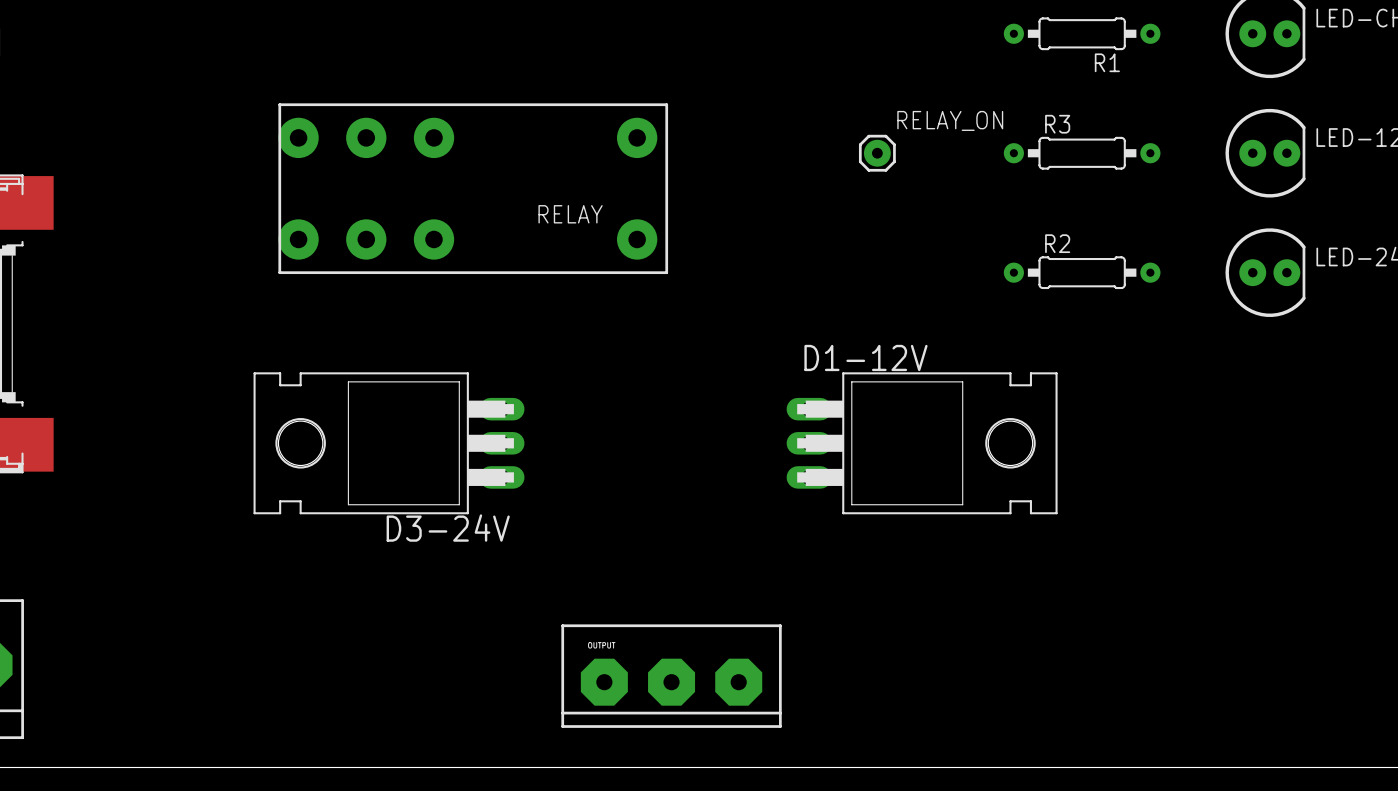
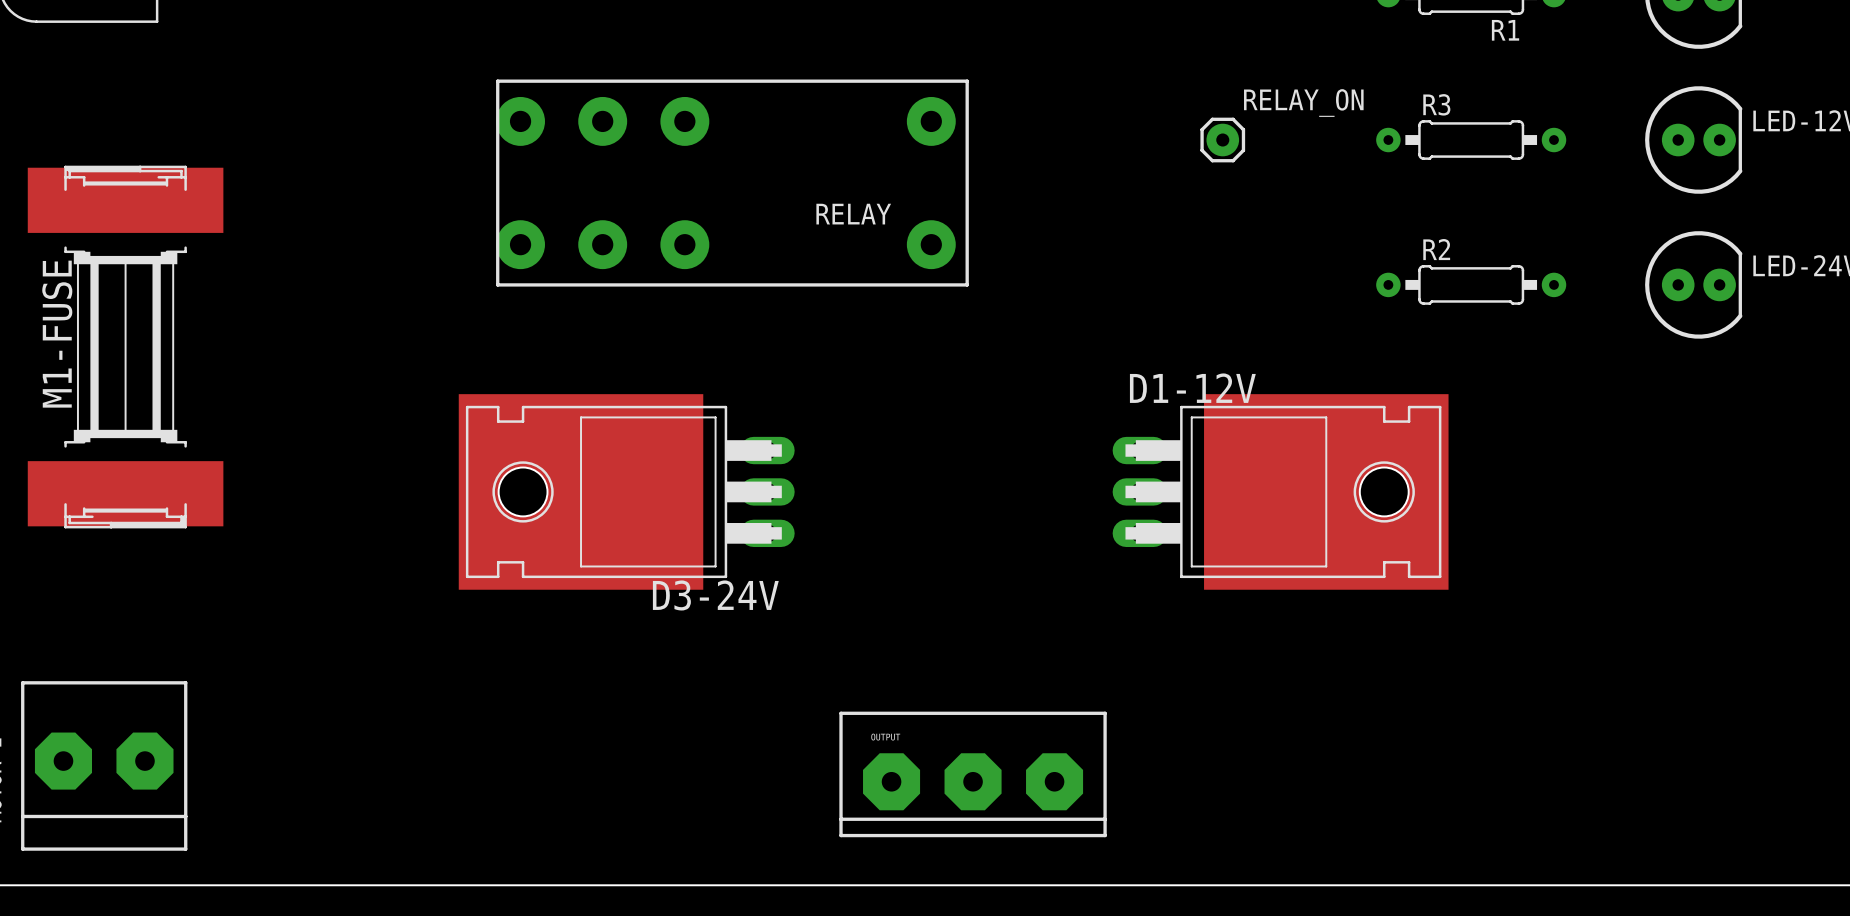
D3-24V footprint: [253, 372, 525, 515] -> [458, 394, 795, 590]
D1-12V footprint: [786, 372, 1058, 515] -> [1112, 394, 1449, 590]

